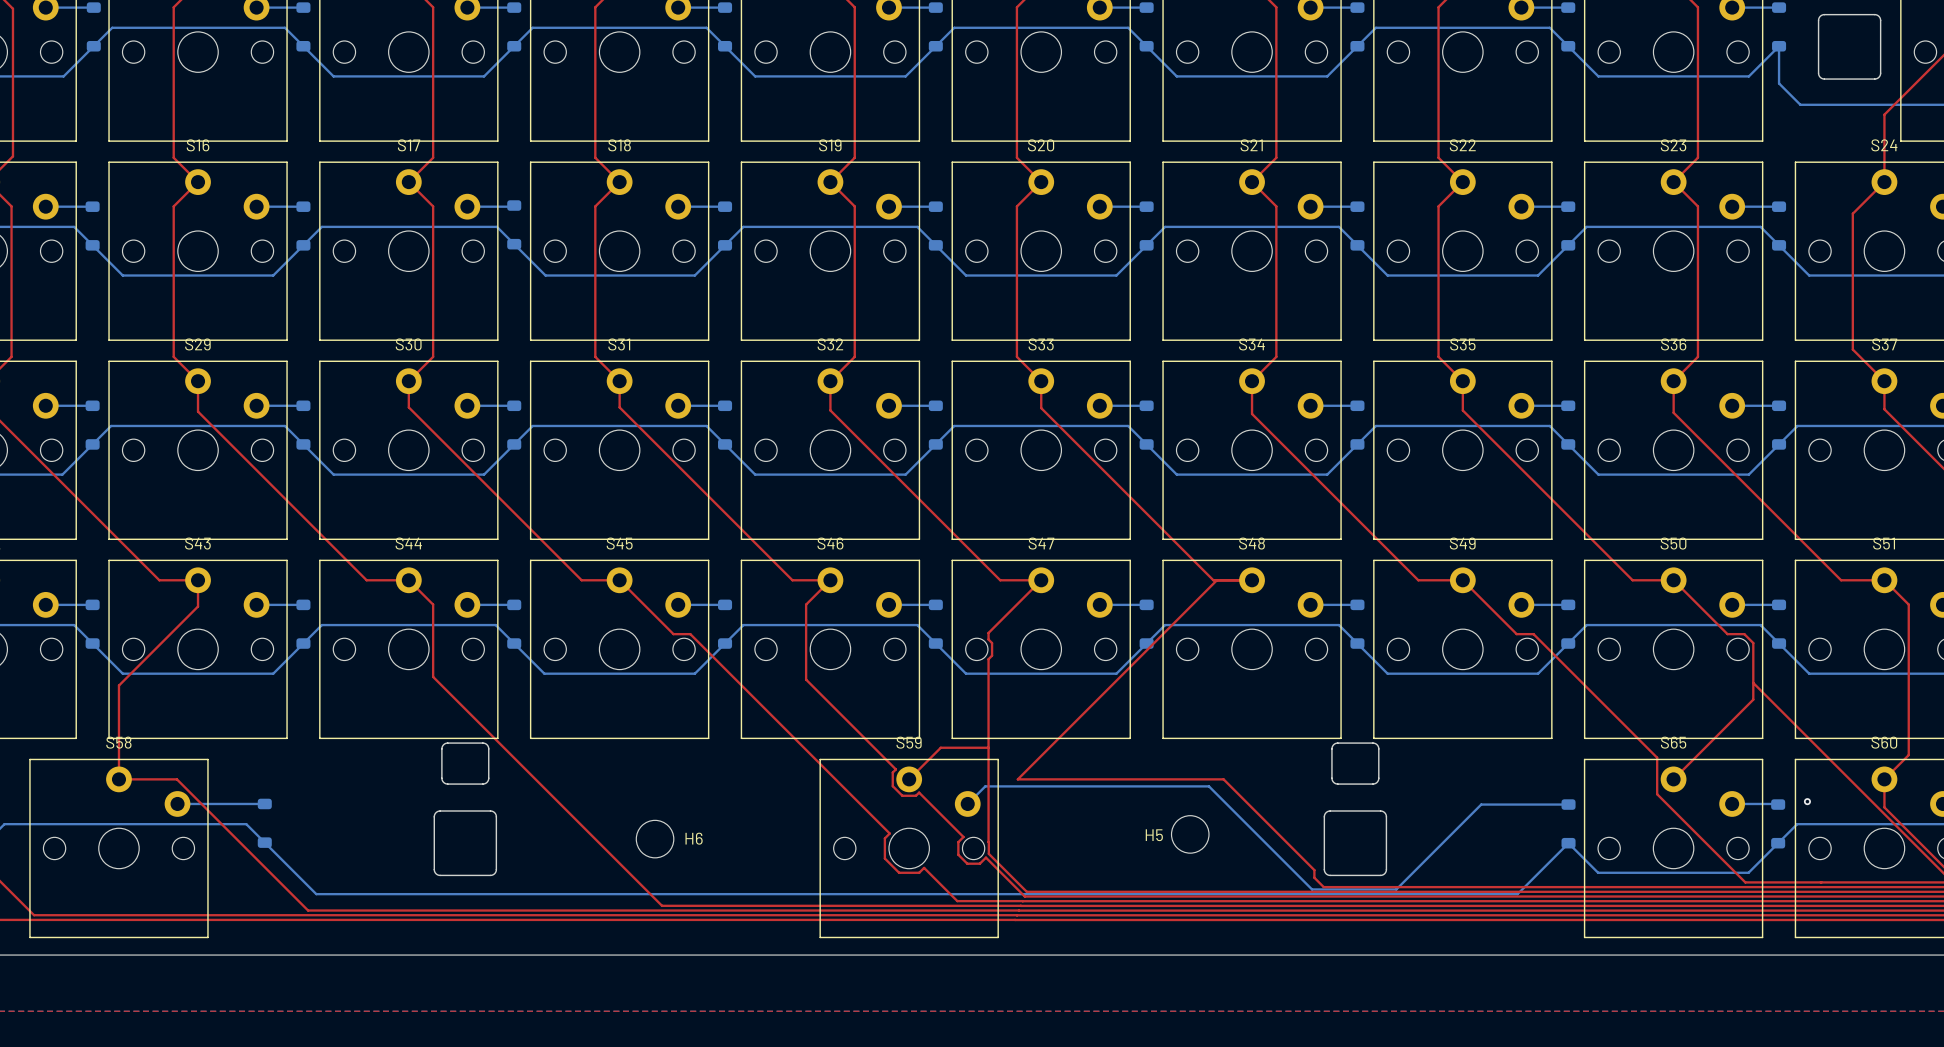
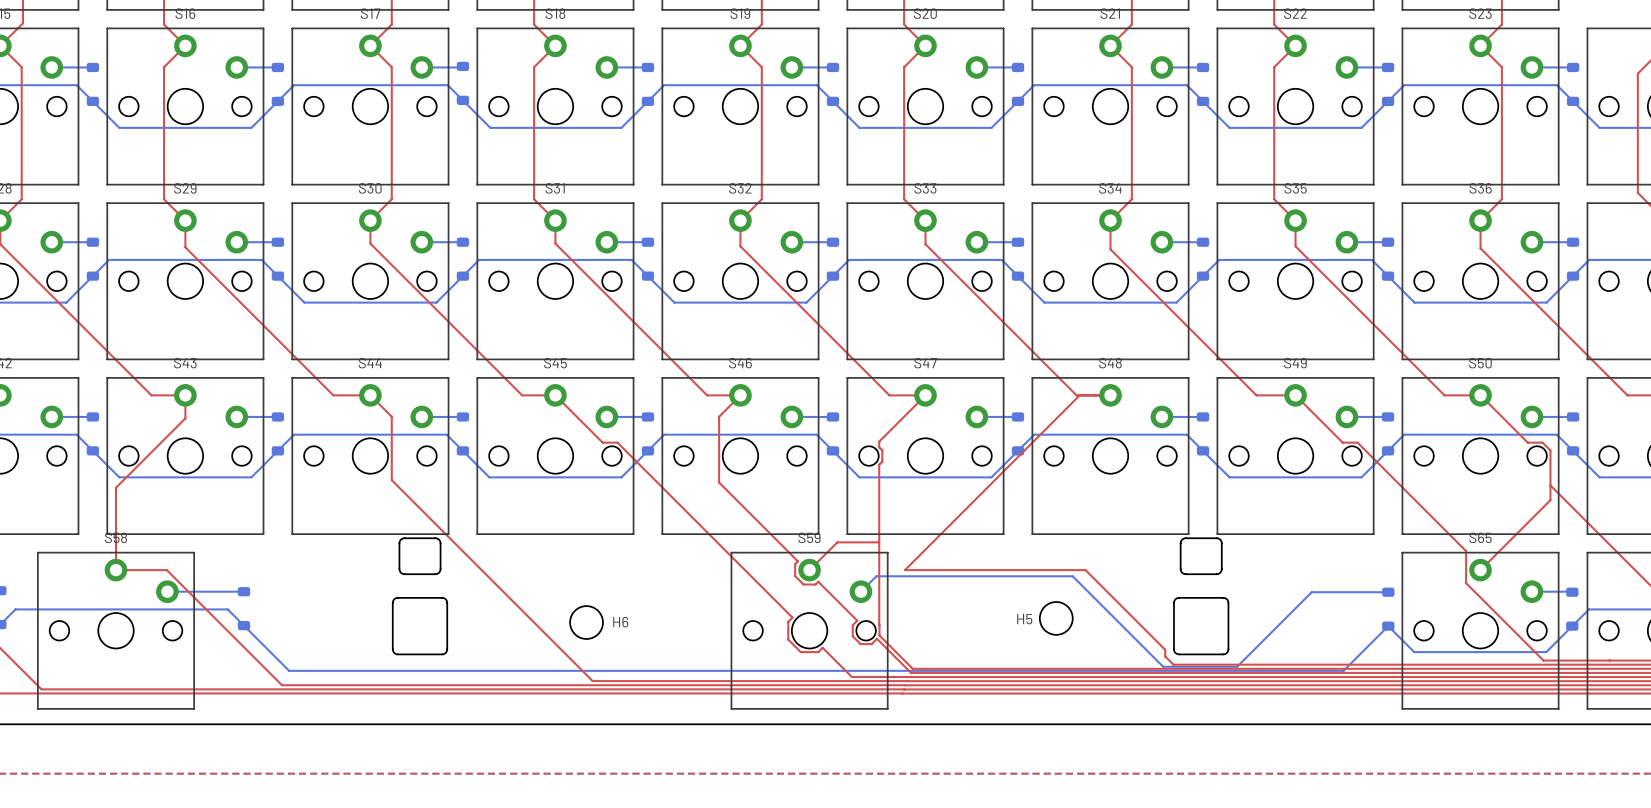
via: (1807, 801) -> none

